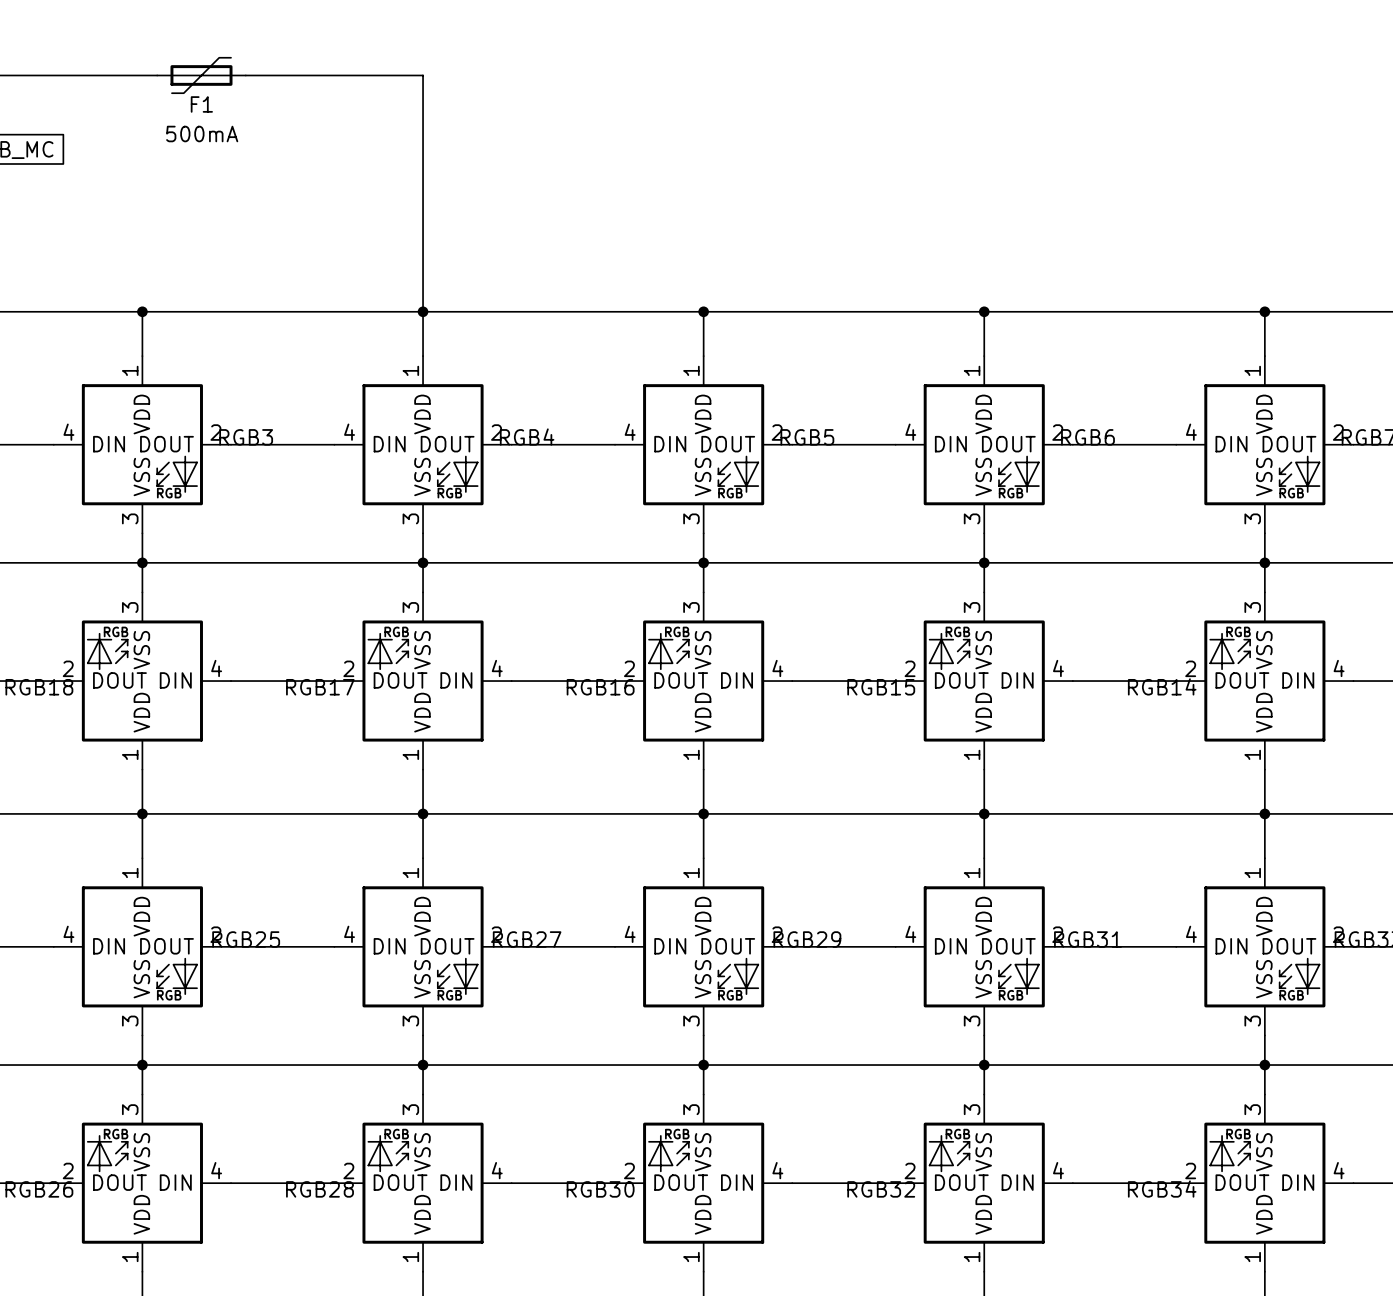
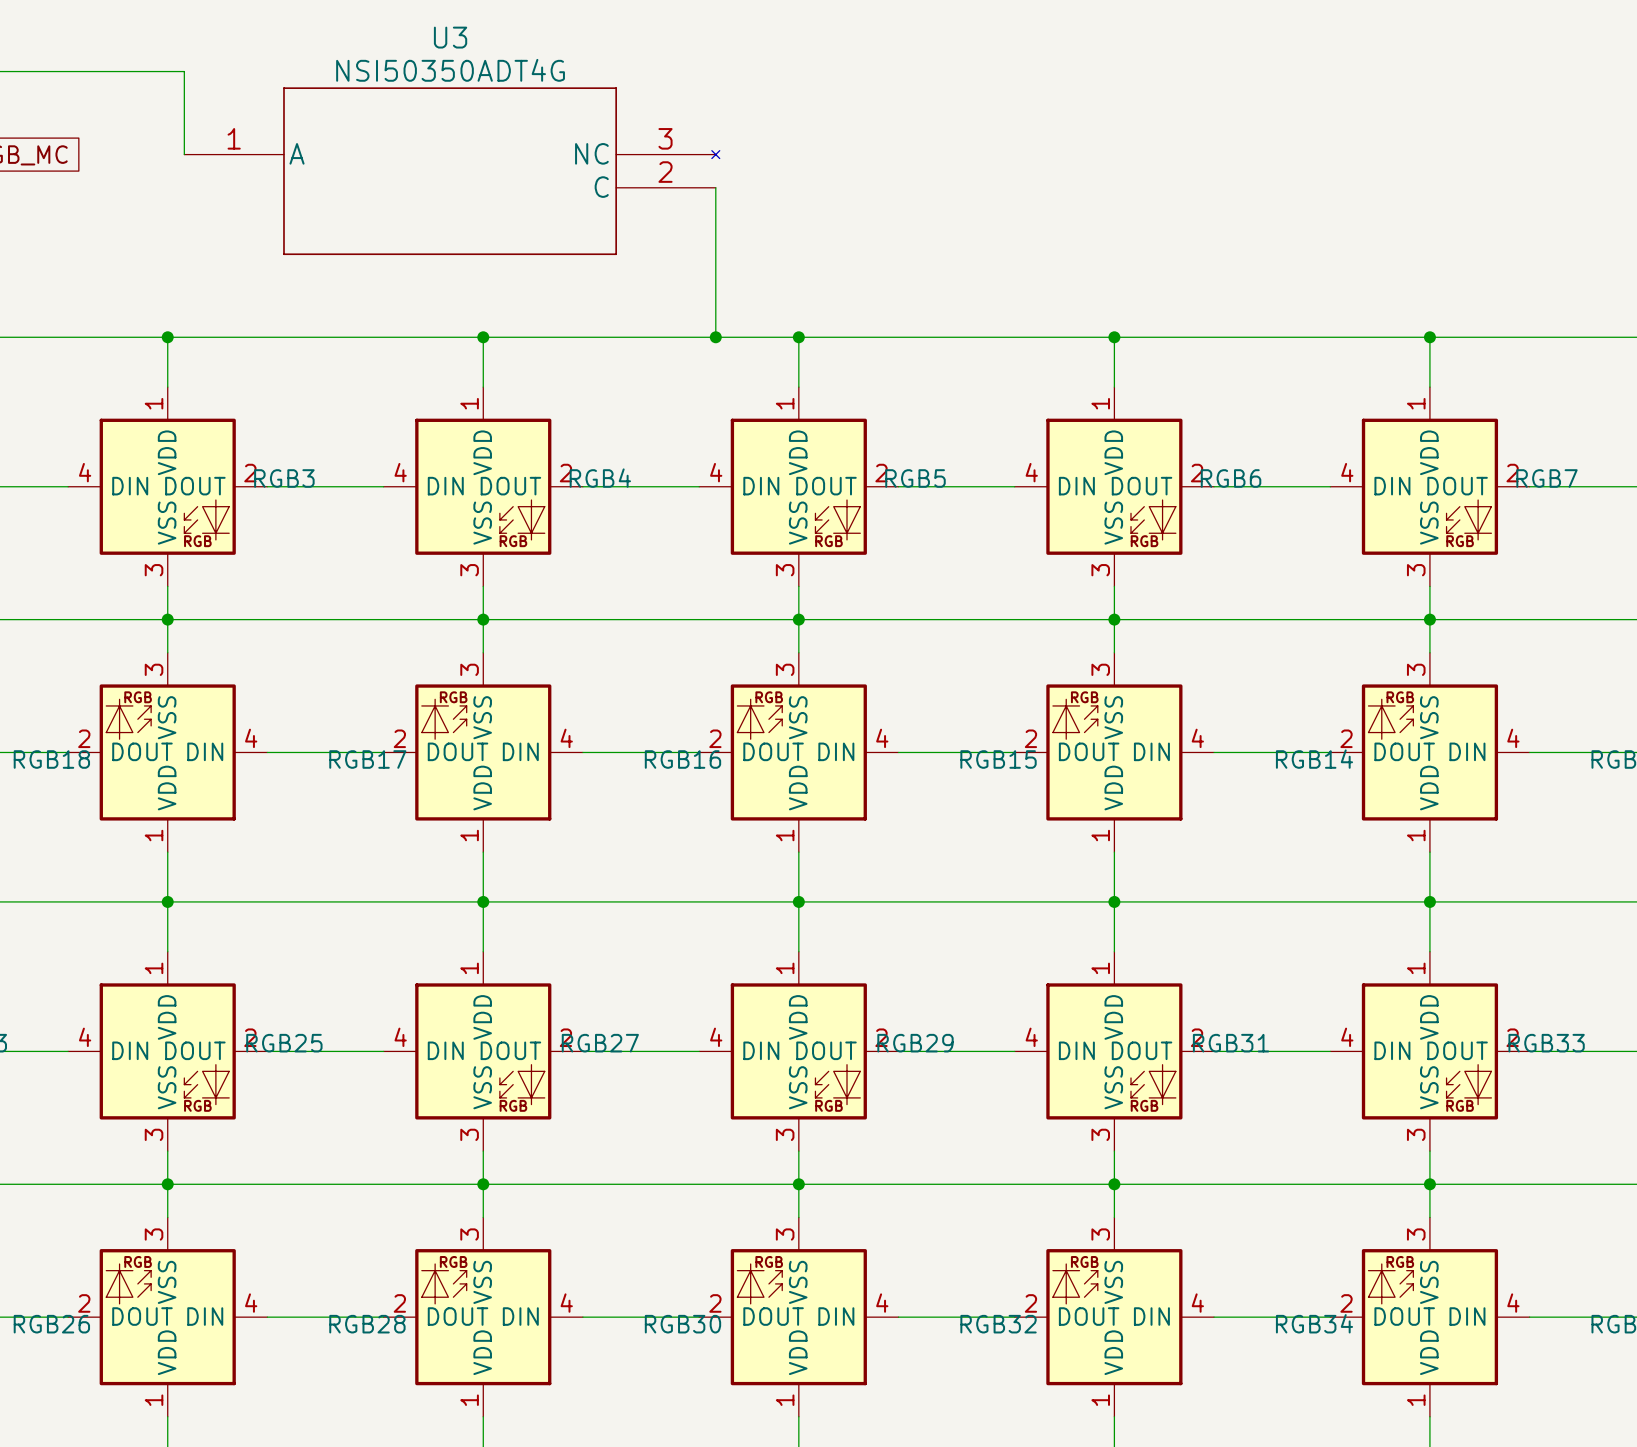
wire: none -> (184, 71) (184, 154)
F1: 500mA (201, 75) -> none
wire: (245, 75) (423, 75) (423, 311) -> none
U3: none -> NSI50350ADT4G (452, 171)
wire: none -> (715, 187) (715, 337)
junction: none -> (715, 337)

